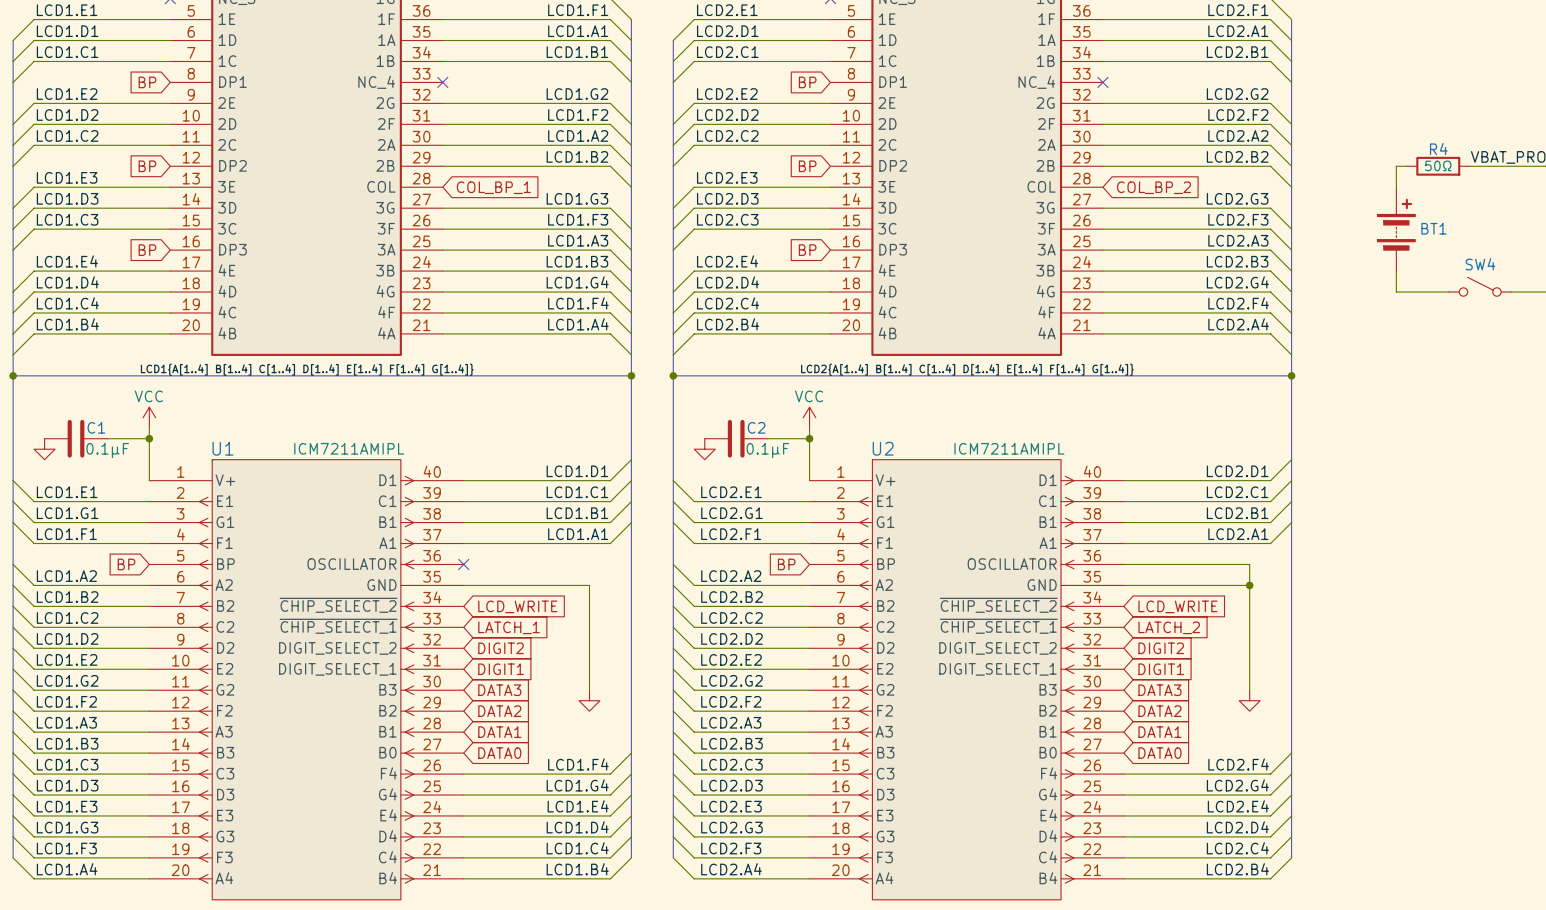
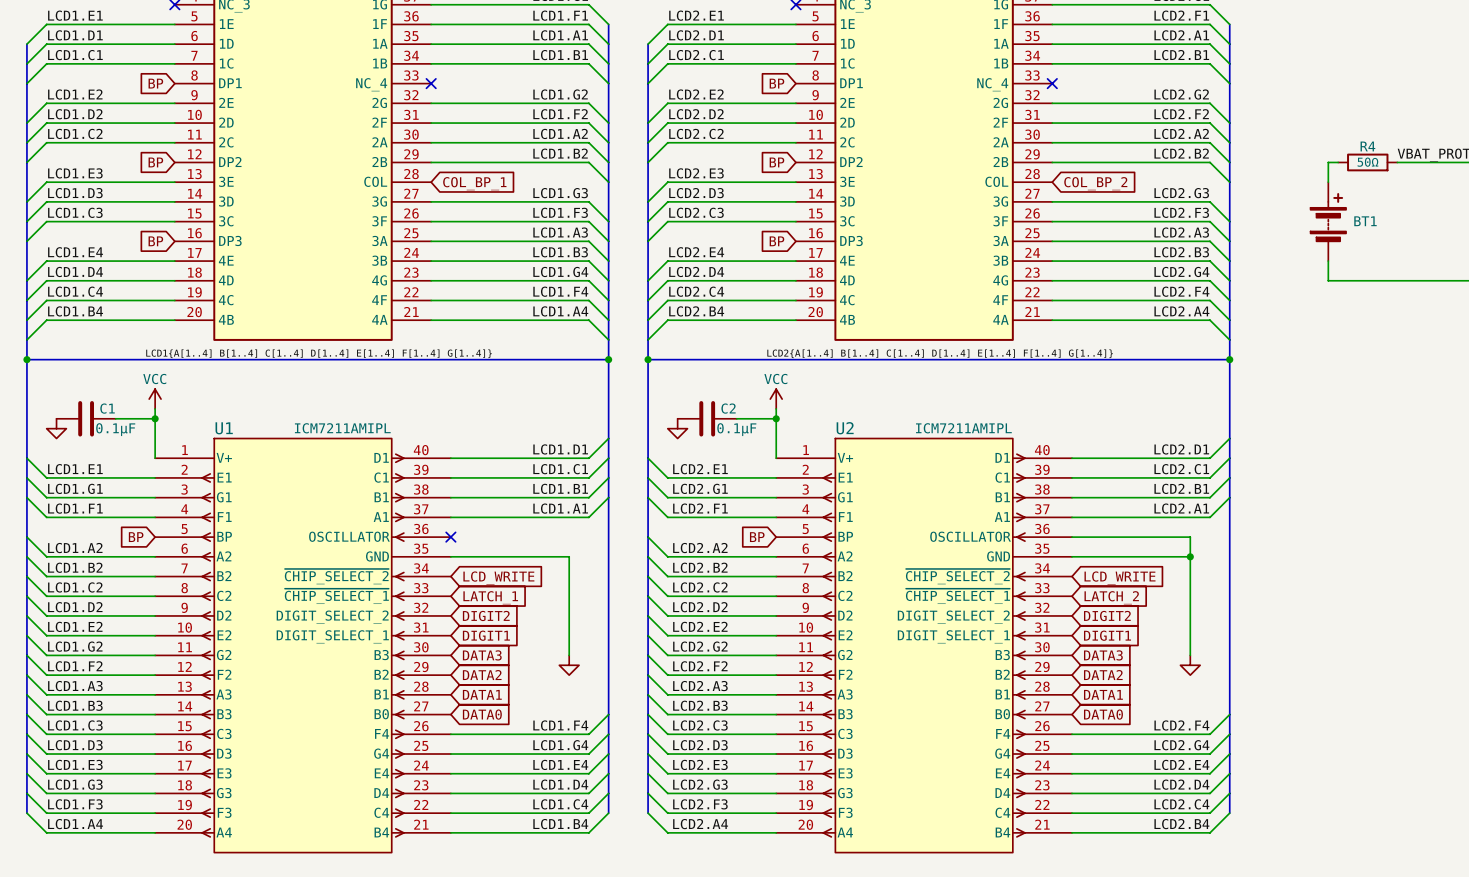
SW4: (1480, 286) -> none
wire: none -> (1377, 280) (1436, 280)

